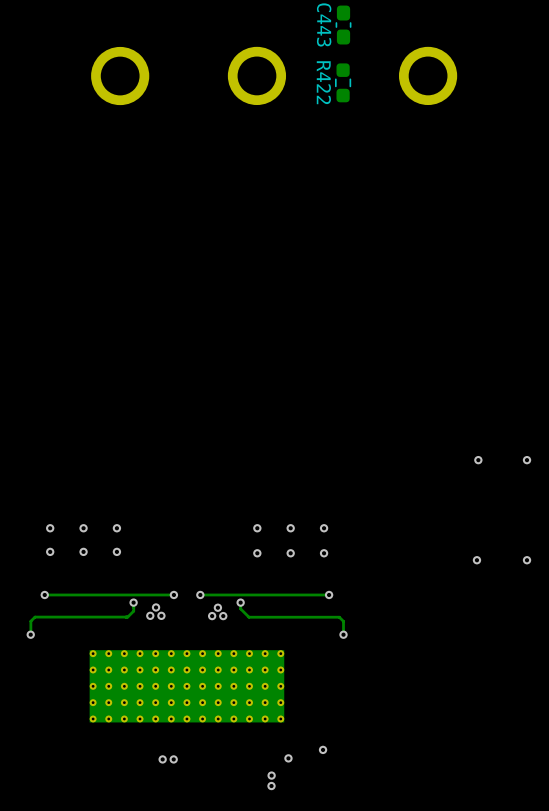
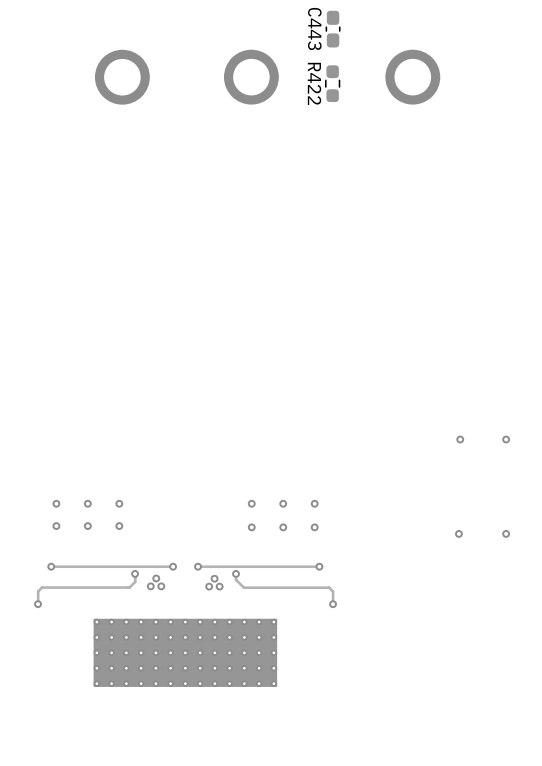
via: (323, 749) -> none
via: (288, 758) -> none
via: (162, 759) -> none
via: (173, 759) -> none
via: (271, 775) -> none
via: (271, 786) -> none

